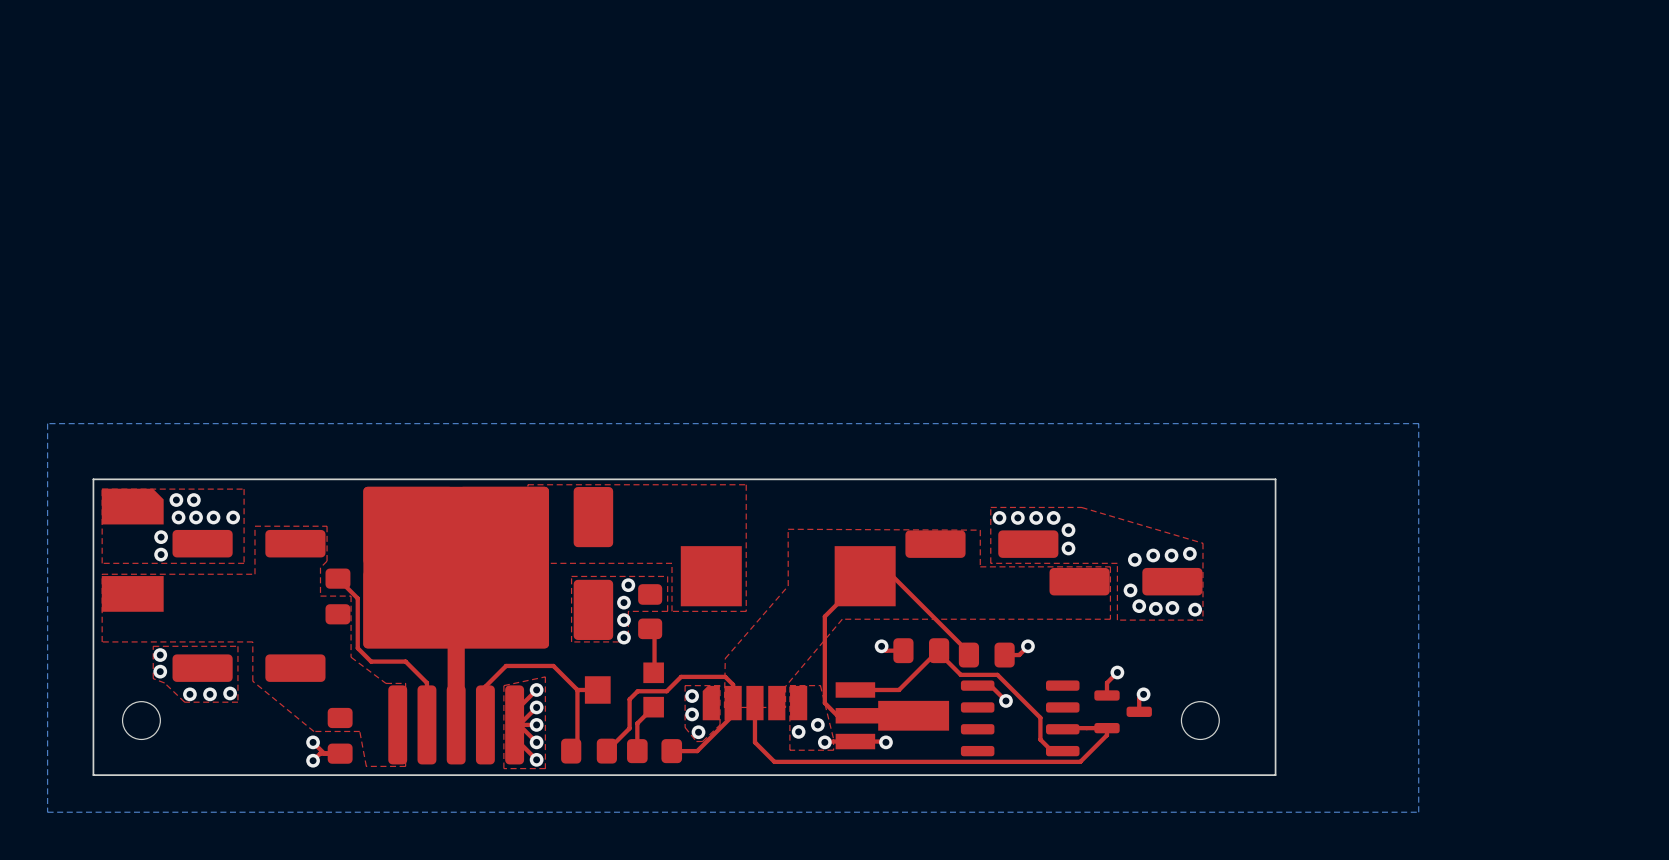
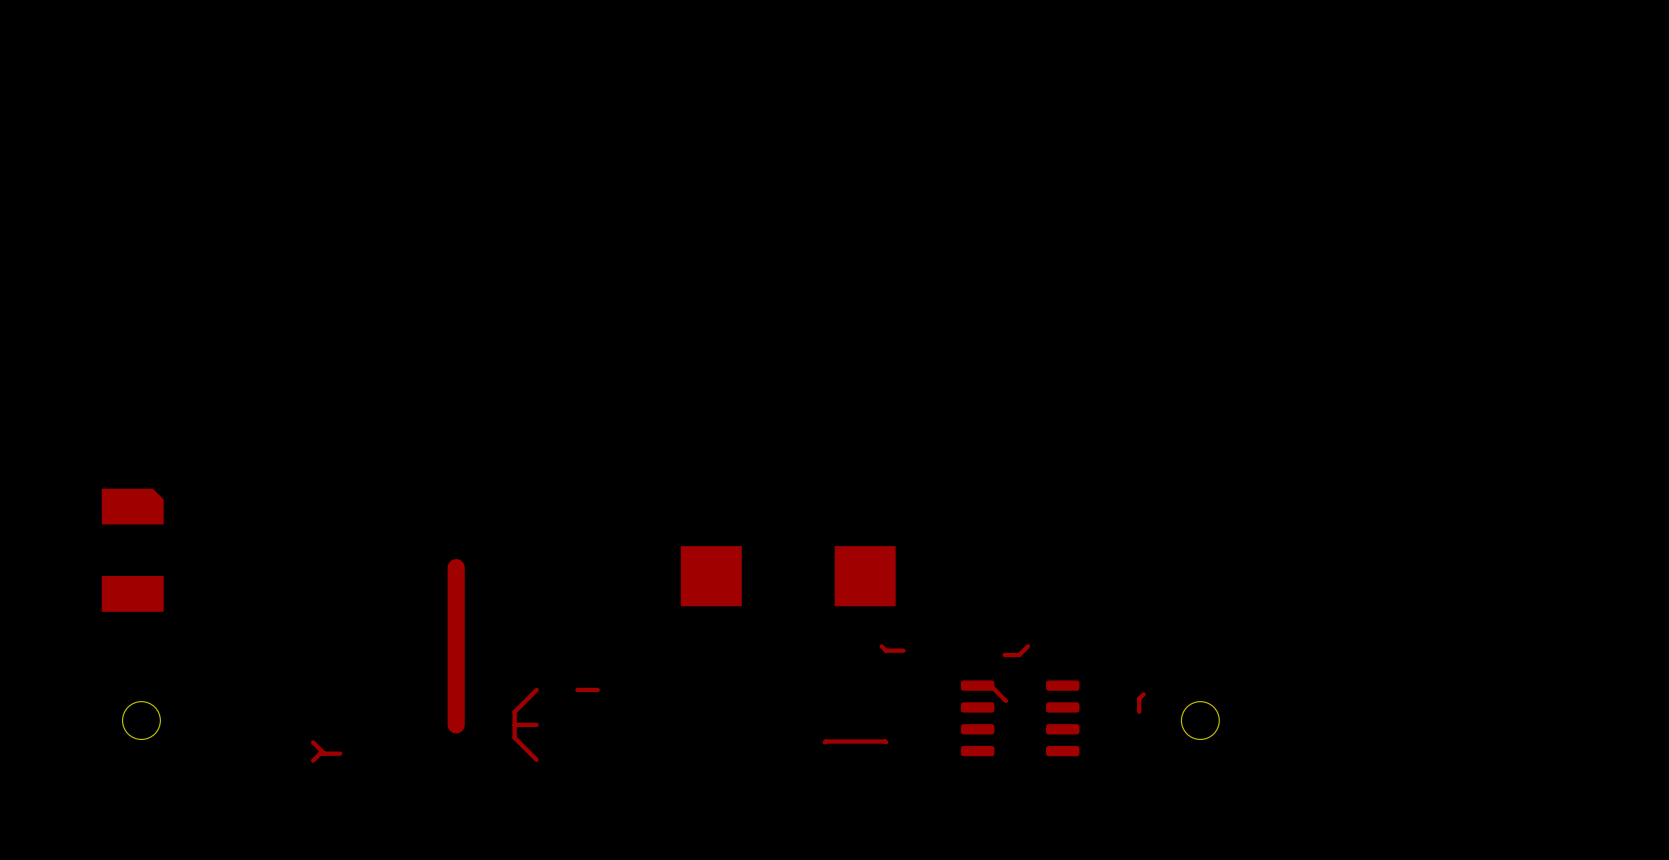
bottom zone outline: (1418, 423) (47, 423) (47, 812) (1418, 812) (1418, 423) -> none
board edge: (1275, 479) (93, 479) (93, 775) (1275, 775) (1275, 479) -> none
top zone outline: (746, 484) (527, 484) (527, 563) (672, 563) (672, 611) (746, 611) (746, 484) -> none
top zone outline: (244, 489) (102, 489) (102, 563) (244, 563) (244, 489) -> none
via: (176, 500) -> none
via: (193, 500) -> none
top zone outline: (1081, 507) (990, 507) (990, 563) (1117, 563) (1117, 620) (1202, 620) (1202, 543) (1081, 507) -> none
via: (178, 517) -> none
via: (196, 517) -> none
via: (213, 517) -> none
via: (233, 517) -> none
via: (999, 517) -> none
via: (1017, 517) -> none
via: (1036, 517) -> none
via: (1053, 517) -> none
top zone outline: (327, 526) (254, 526) (254, 574) (102, 574) (102, 641) (252, 641) (252, 681) (313, 731) (359, 731) (366, 766) (405, 766) (405, 683) (385, 683) (351, 657) (351, 596) (320, 596) (320, 567) (327, 561) (327, 526) -> none
top zone outline: (788, 529) (788, 586) (725, 658) (724, 707) (785, 707) (785, 686) (842, 619) (1110, 619) (1110, 566) (980, 566) (980, 530) (788, 529) -> none
via: (1068, 530) -> none
via: (161, 537) -> none
part: (249, 543) -> none
part: (981, 544) -> none
via: (1068, 548) -> none
via: (1189, 553) -> none
via: (161, 554) -> none
via: (1153, 555) -> none
via: (1171, 555) -> none
via: (1134, 559) -> none
part: (593, 563) -> none
top zone outline: (667, 576) (571, 576) (571, 641) (628, 641) (628, 611) (667, 611) (667, 576) -> none
top track: (337, 578) (357, 598) (357, 648) (371, 661) (405, 661) (426, 682) (426, 724) -> none
part: (1126, 581) -> none
via: (628, 585) -> none
via: (1130, 590) -> none
part: (337, 596) -> none
via: (623, 602) -> none
via: (1139, 606) -> none
via: (1172, 607) -> none
via: (1155, 608) -> none
via: (1195, 609) -> none
part: (650, 611) -> none
via: (623, 620) -> none
part: (456, 625) -> none
top track: (654, 628) (653, 672) -> none
via: (623, 637) -> none
top zone outline: (237, 646) (237, 702) (184, 702) (164, 682) (153, 678) (153, 646) (237, 646) -> none
via: (881, 646) -> none
via: (1027, 646) -> none
part: (921, 650) -> none
via: (160, 655) -> none
top track: (968, 655) (968, 652) (892, 576) (865, 576) (824, 616) (824, 703) (837, 715) (856, 715) -> none
part: (986, 655) -> none
part: (249, 668) -> none
via: (160, 671) -> none
top track: (1117, 672) (1107, 682) (1107, 695) -> none
via: (1117, 672) -> none
top zone outline: (545, 676) (503, 685) (503, 768) (545, 768) (545, 676) -> none
top zone outline: (720, 685) (685, 685) (685, 727) (696, 741) (702, 741) (720, 724) (720, 685) -> none
top zone outline: (820, 685) (789, 685) (789, 750) (833, 750) (833, 738) (820, 685) -> none
via: (536, 689) -> none
part: (624, 689) -> none
top track: (855, 689) (899, 689) (939, 650) (939, 653) (960, 674) (997, 674) (1040, 717) (1040, 739) (1051, 751) (1062, 751) -> none
via: (230, 693) -> none
via: (189, 694) -> none
via: (210, 694) -> none
via: (1143, 694) -> none
via: (692, 696) -> none
via: (1005, 700) -> none
top track: (754, 703) (754, 742) (774, 761) (1080, 761) (1107, 735) (1107, 728) (1062, 729) -> none
part: (754, 703) -> none
top track: (536, 707) (519, 724) (536, 742) -> none
via: (536, 707) -> none
top track: (653, 707) (637, 723) (637, 751) -> none
part: (1123, 711) -> none
via: (692, 714) -> none
part: (892, 715) -> none
top track: (485, 724) (485, 686) (506, 665) (553, 665) (577, 689) (577, 744) (571, 751) -> none
via: (536, 724) -> none
via: (817, 724) -> none
via: (798, 731) -> none
via: (698, 732) -> none
part: (340, 735) -> none
via: (313, 742) -> none
via: (536, 742) -> none
via: (824, 742) -> none
via: (885, 742) -> none
part: (589, 751) -> none
part: (654, 751) -> none
top track: (671, 751) (697, 751) (733, 715) (733, 684) (725, 676) (681, 676) (666, 691) (637, 691) (629, 699) (629, 728) (606, 751) -> none
via: (536, 759) -> none
via: (313, 760) -> none

